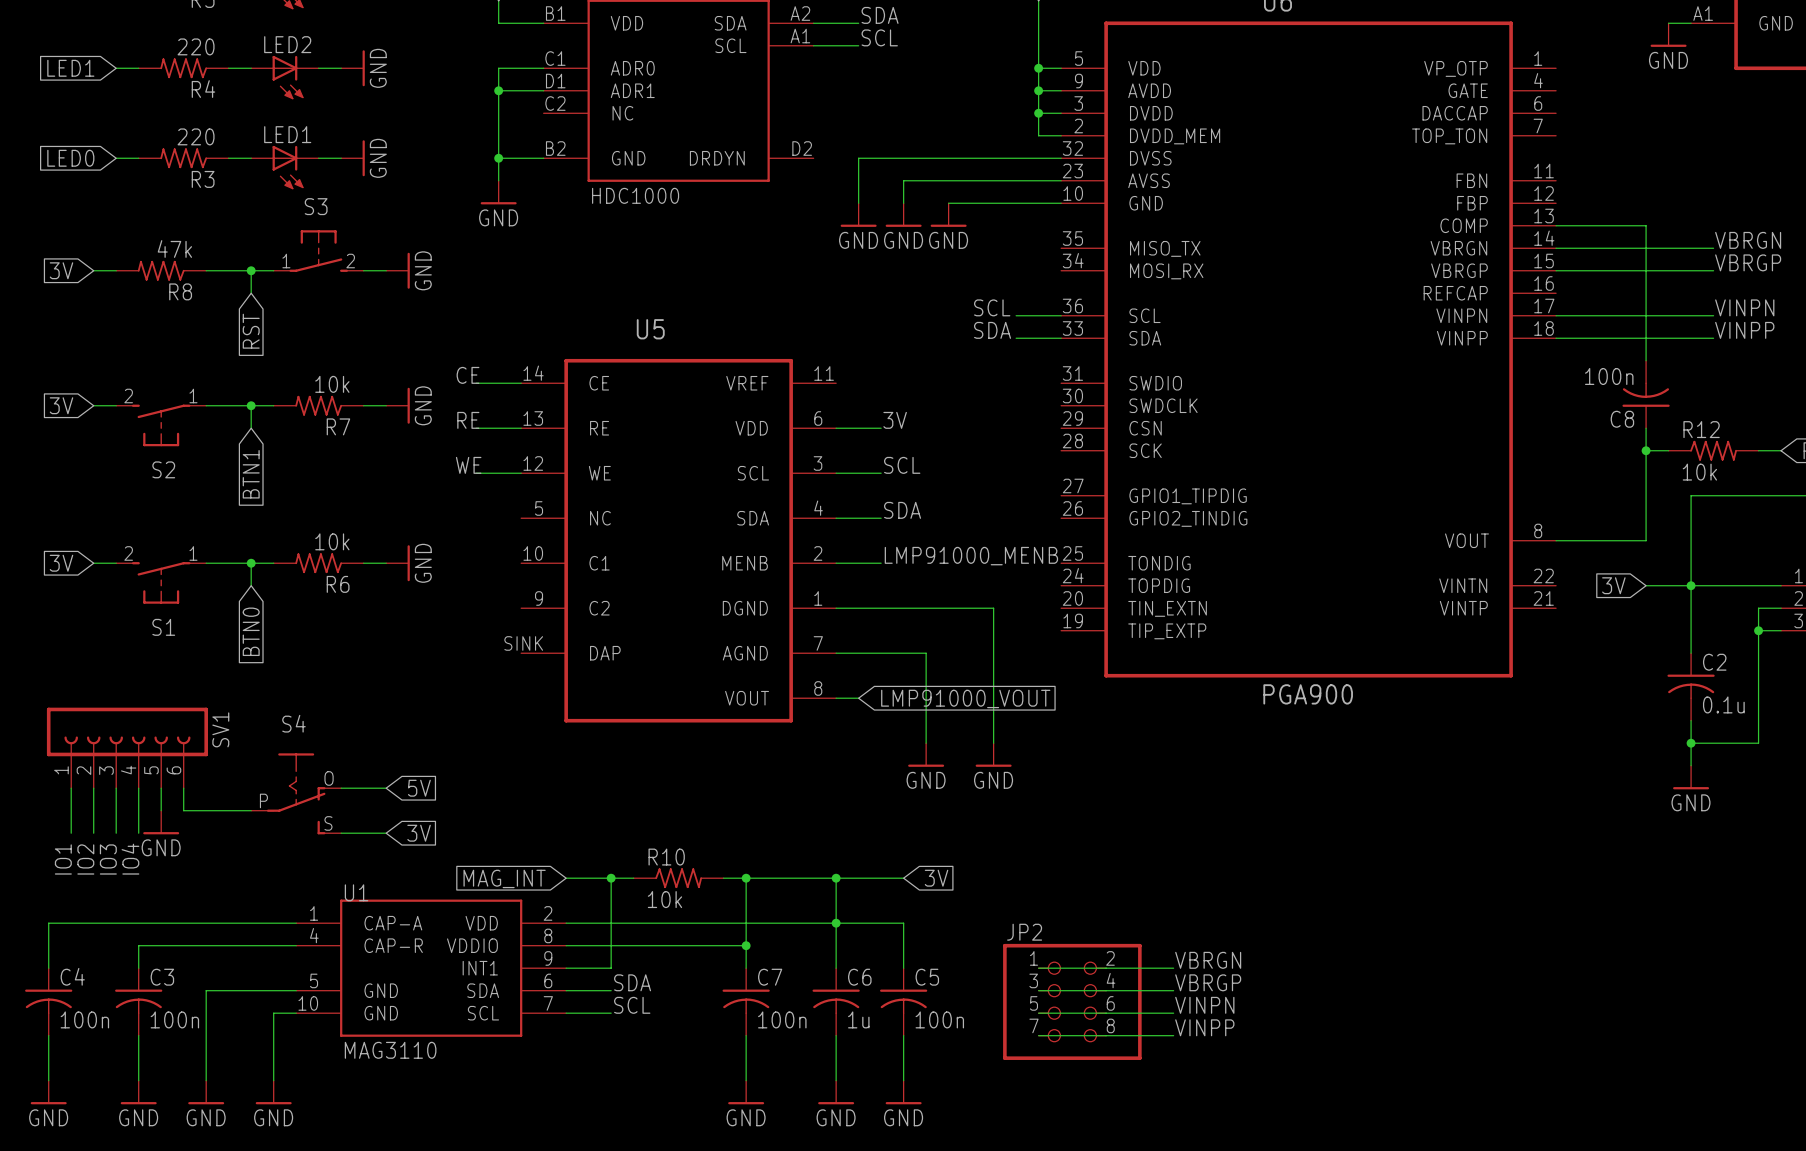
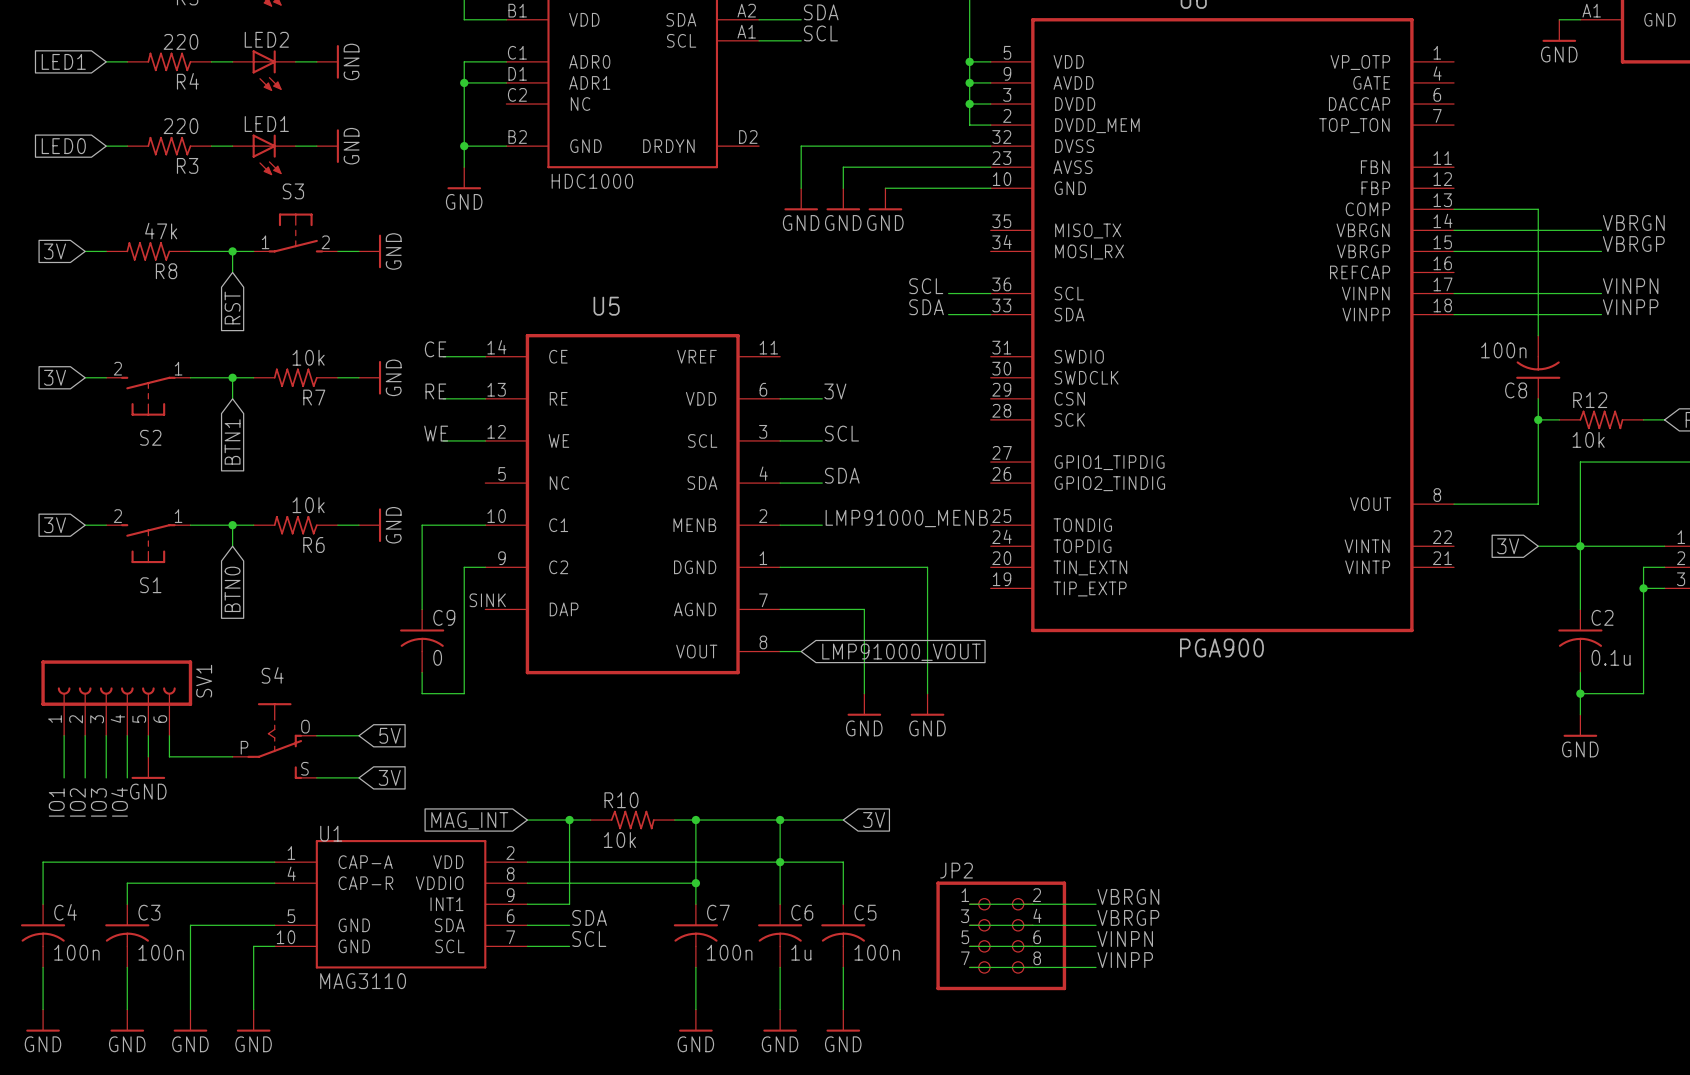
wire: none -> (485, 525) (422, 525) (422, 609)
wire: none -> (485, 567) (464, 567) (464, 693) (422, 693) (422, 672)
C9: none -> 0 (422, 641)

